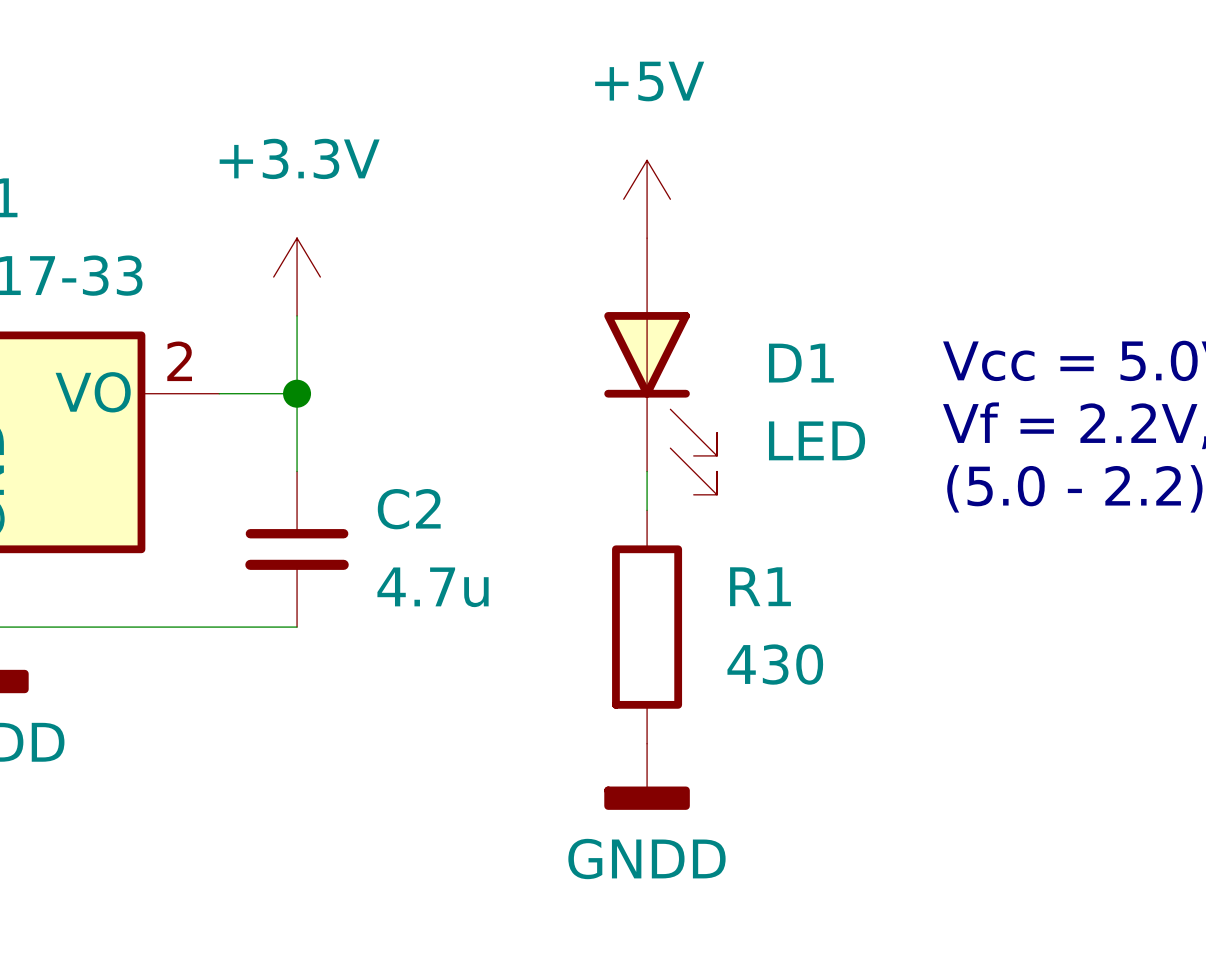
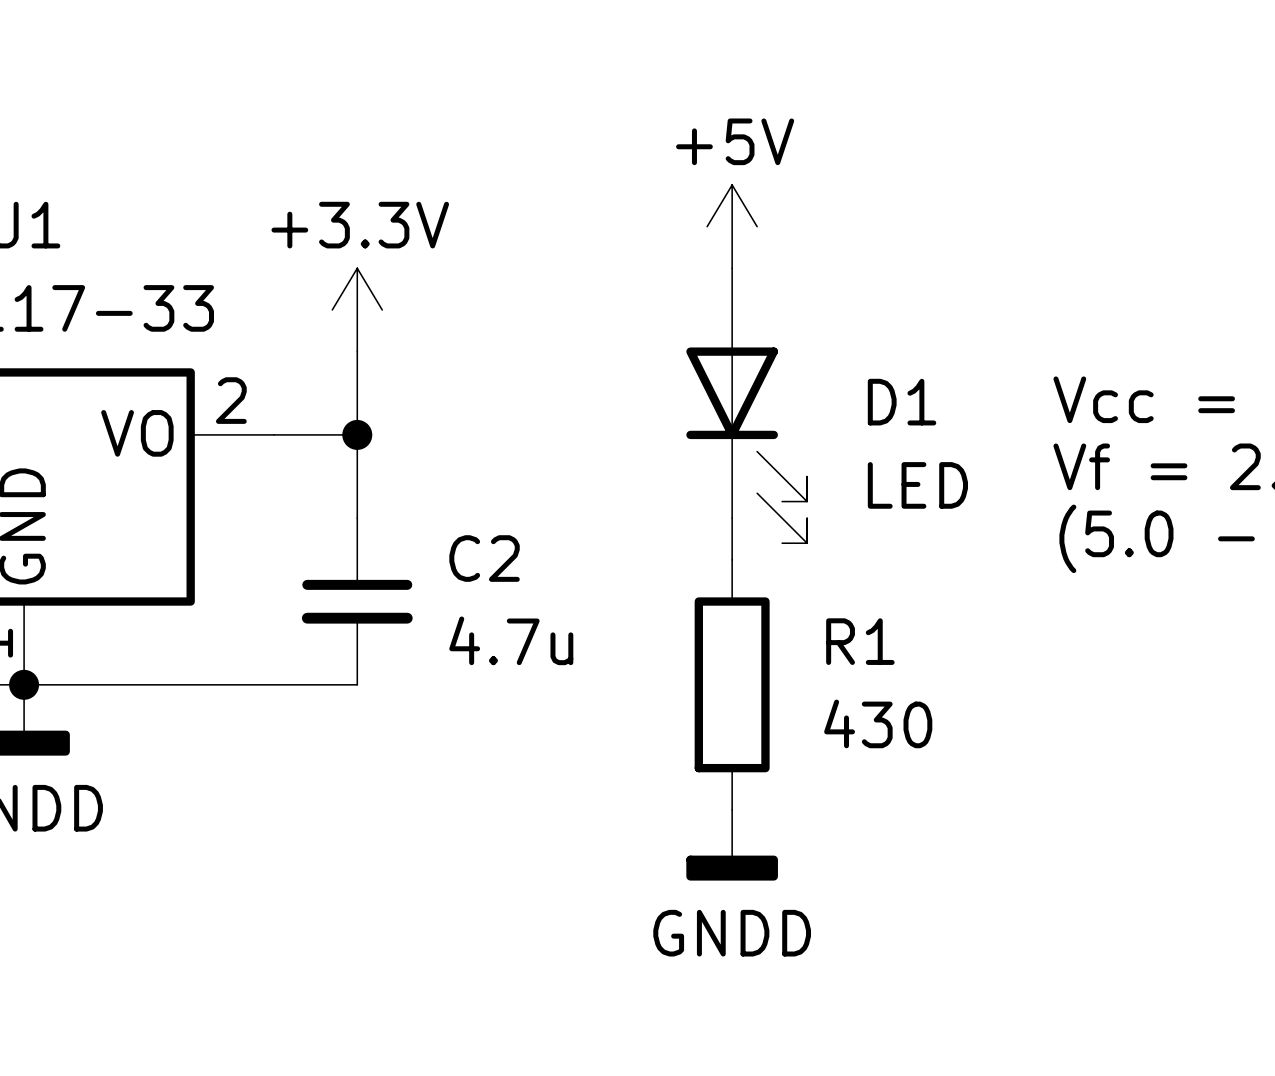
power symbol text position: +5V (649, 81) -> +5V (735, 141)
power symbol text position: +3.3V (299, 158) -> +3.3V (360, 225)

